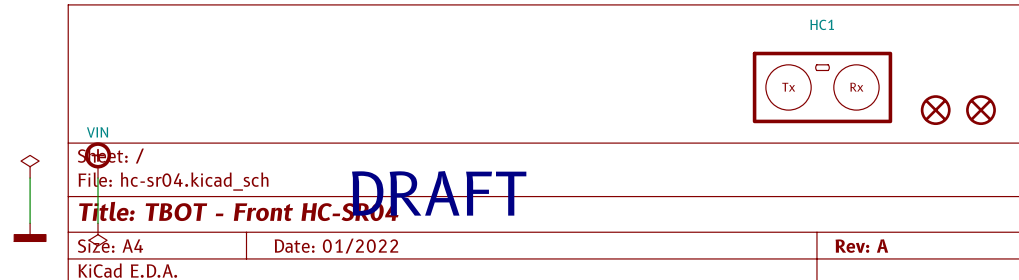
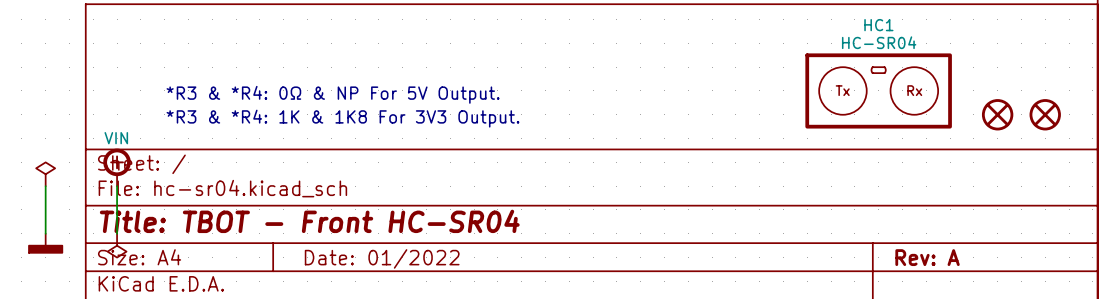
HC1 value: none -> HC-SR04 (879, 42)
text: none -> *R3 & *R4: 0Ω & NP For 5V Output. (333, 94)
text: none -> *R3 & *R4: 1K & 1K8 For 3V3 Output. (342, 118)
text: DRAFT (439, 193) -> none

